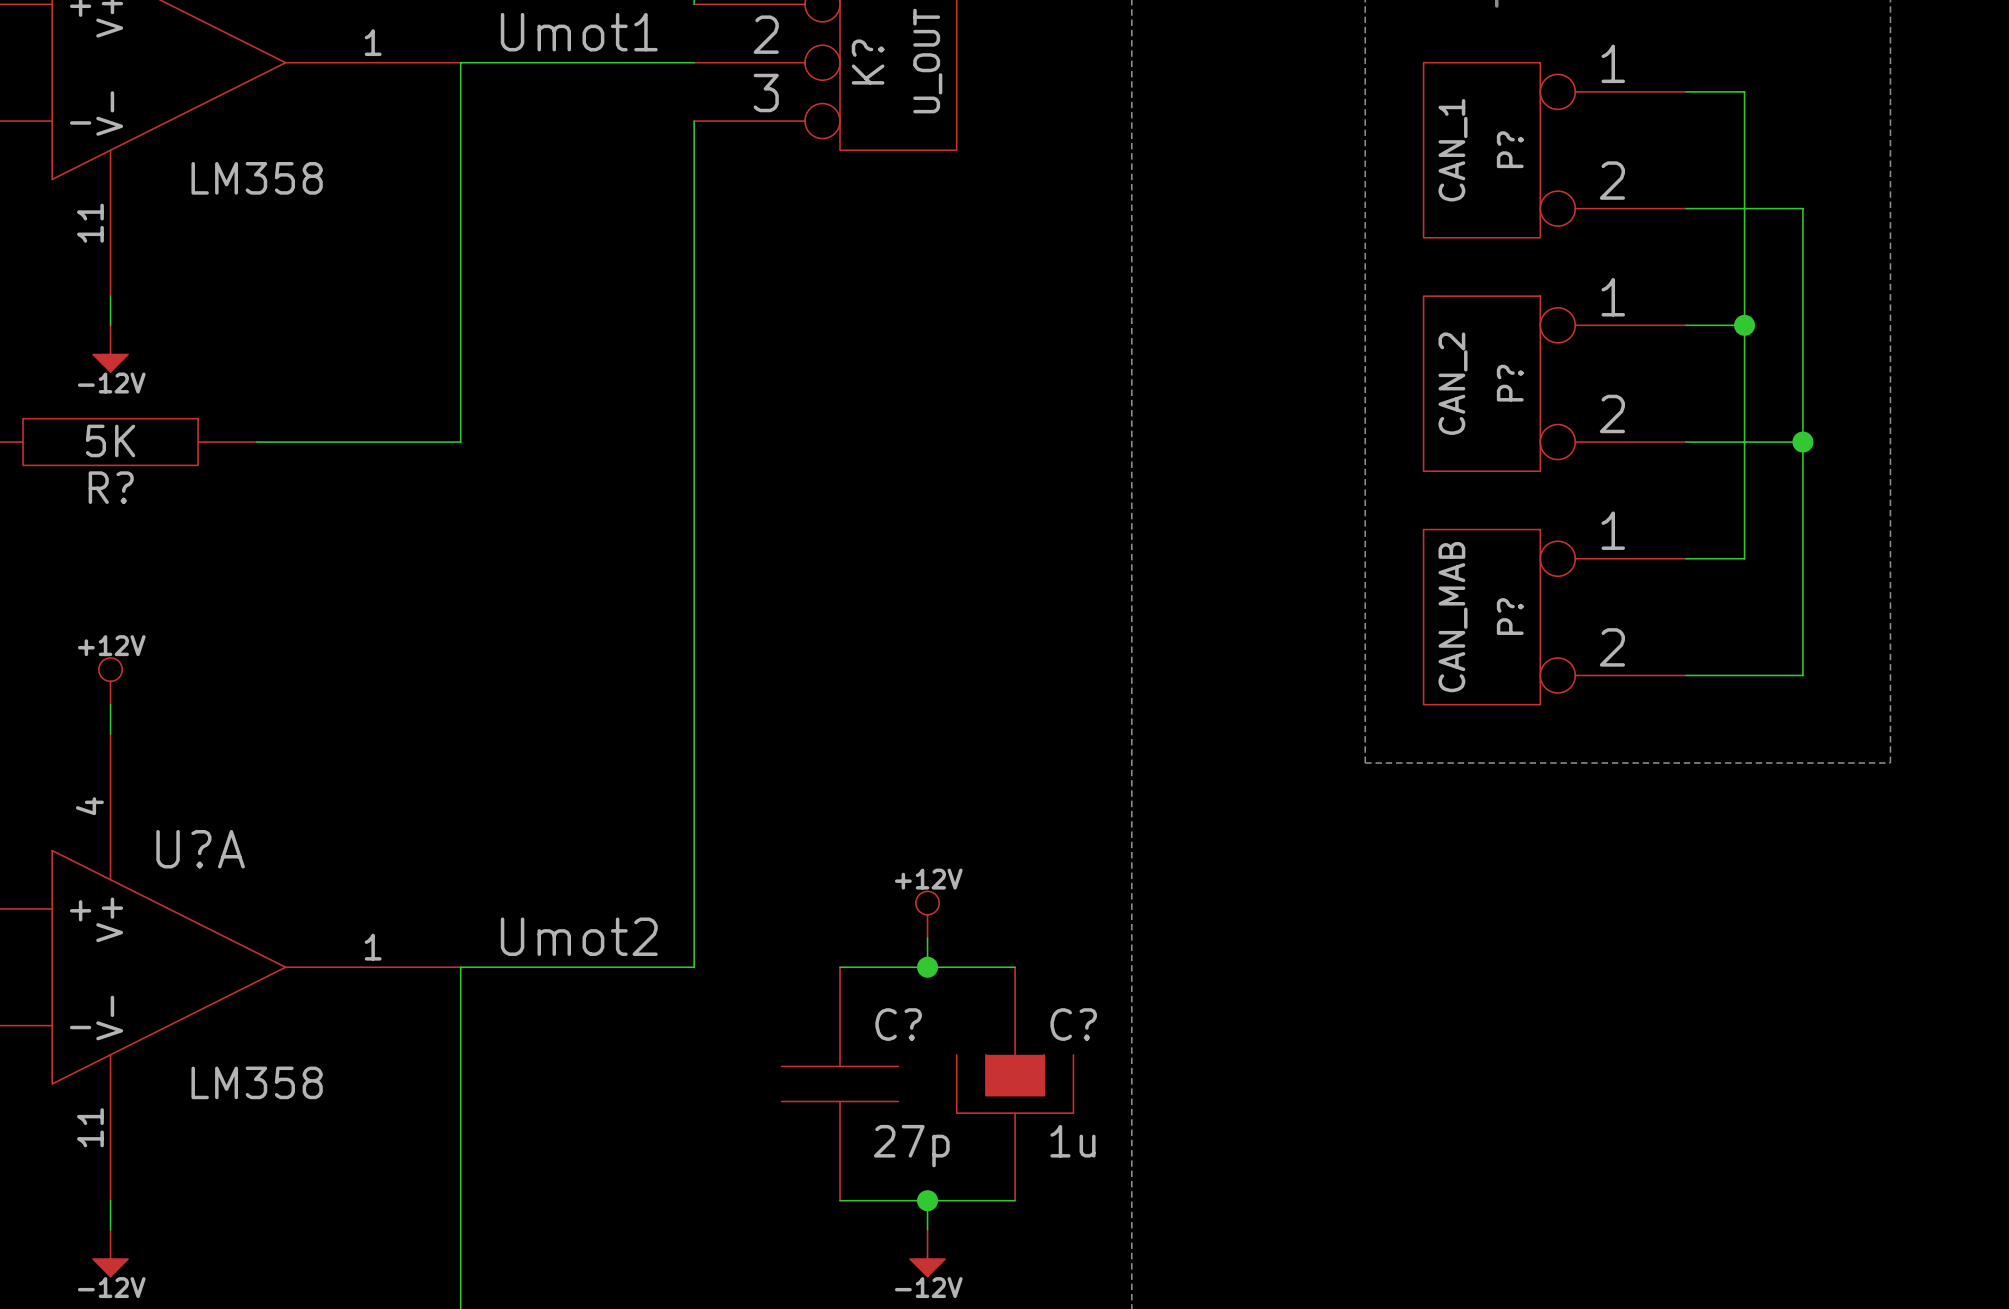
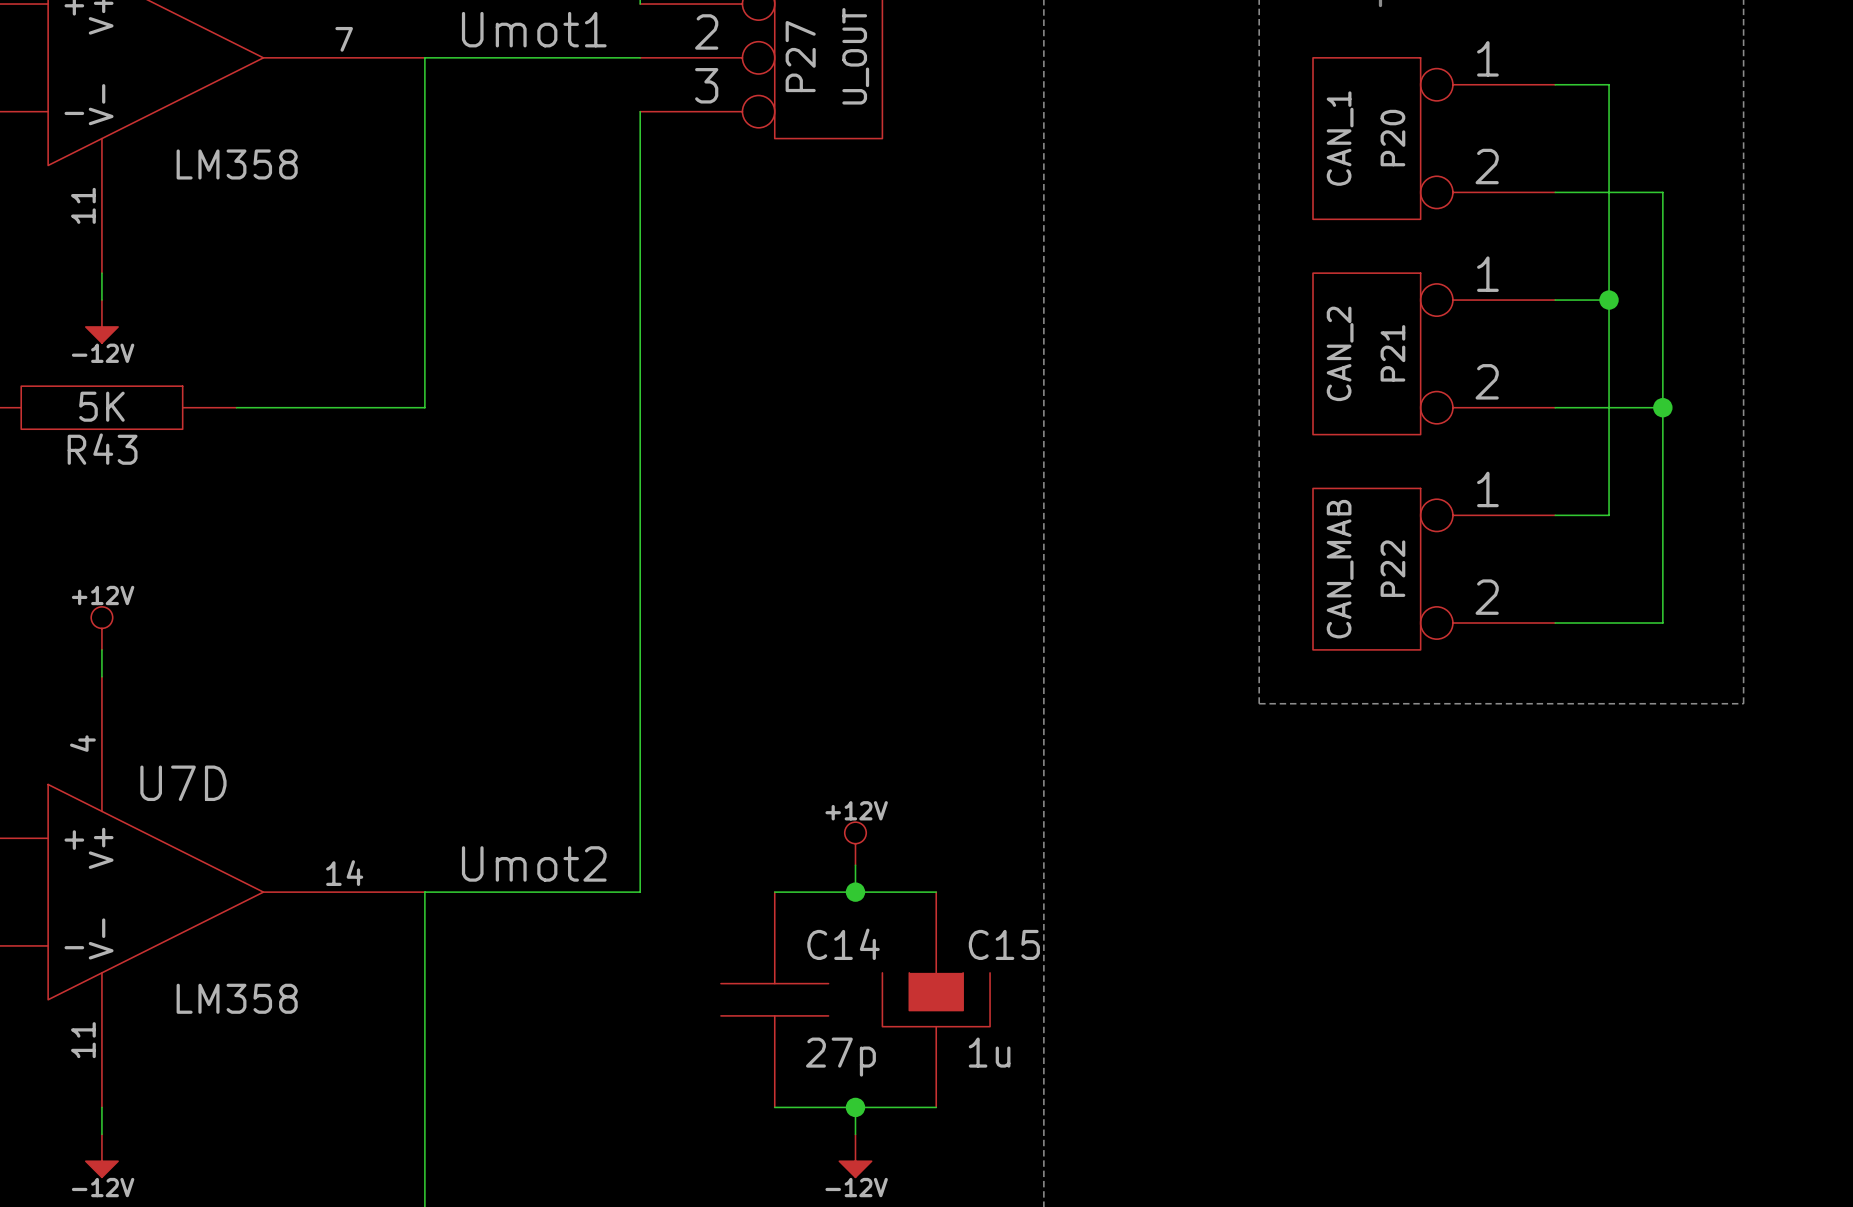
part pin number: 1 (373, 42) -> 7 (344, 39)
K? name: K? (868, 62) -> P27 (800, 56)
P? name: P? (1510, 149) -> P20 (1392, 138)
P? name: P? (1510, 383) -> P21 (1392, 353)
R? name: R? (111, 487) -> R43 (102, 449)
P? name: P? (1510, 616) -> P22 (1392, 568)
U?A name: U?A (200, 849) -> U7D (183, 783)
U?A pin number: 1 (373, 947) -> 14 (344, 873)
C? name: C? (898, 1024) -> C14 (843, 944)
C? name: C? (1073, 1024) -> C15 (1004, 944)

